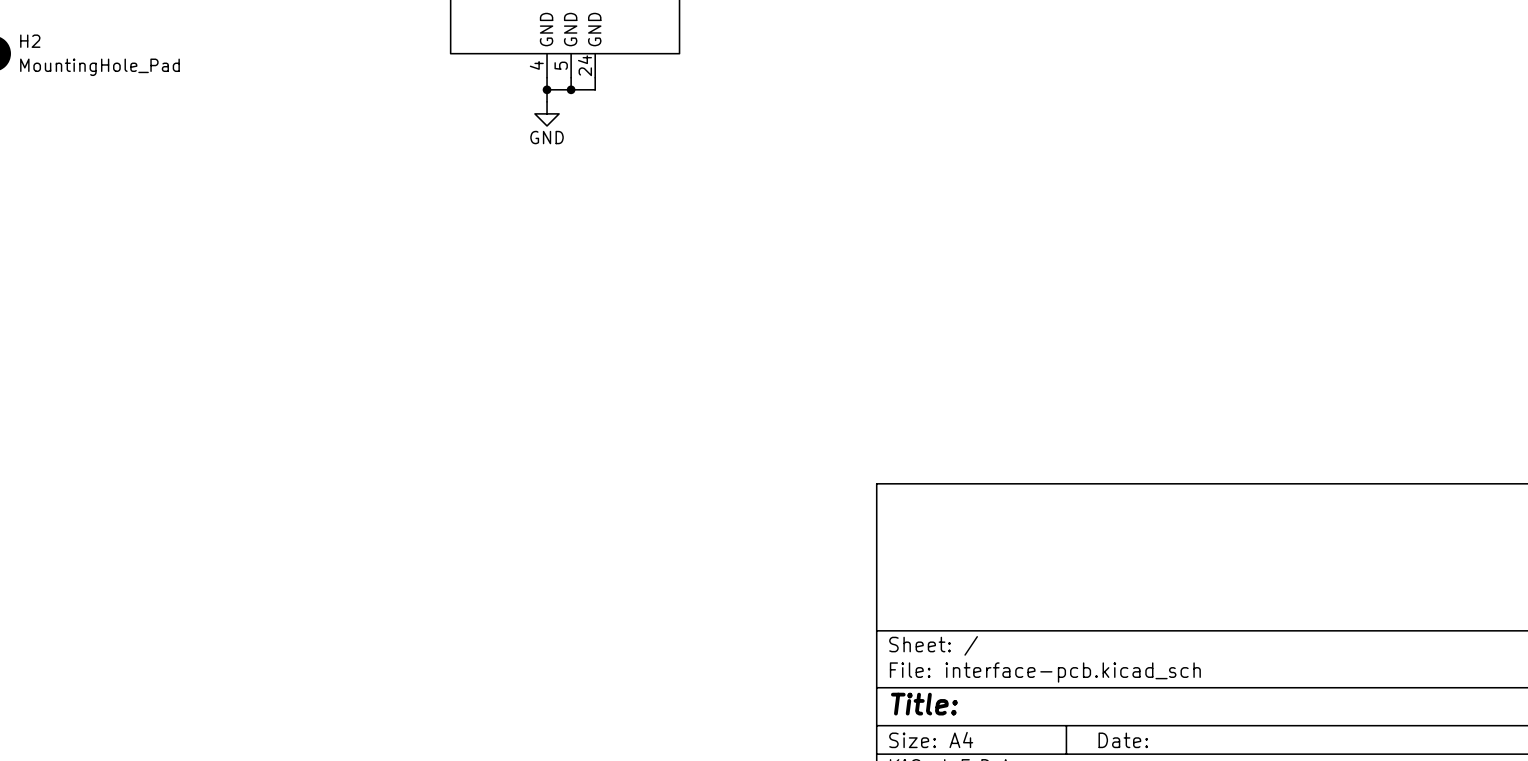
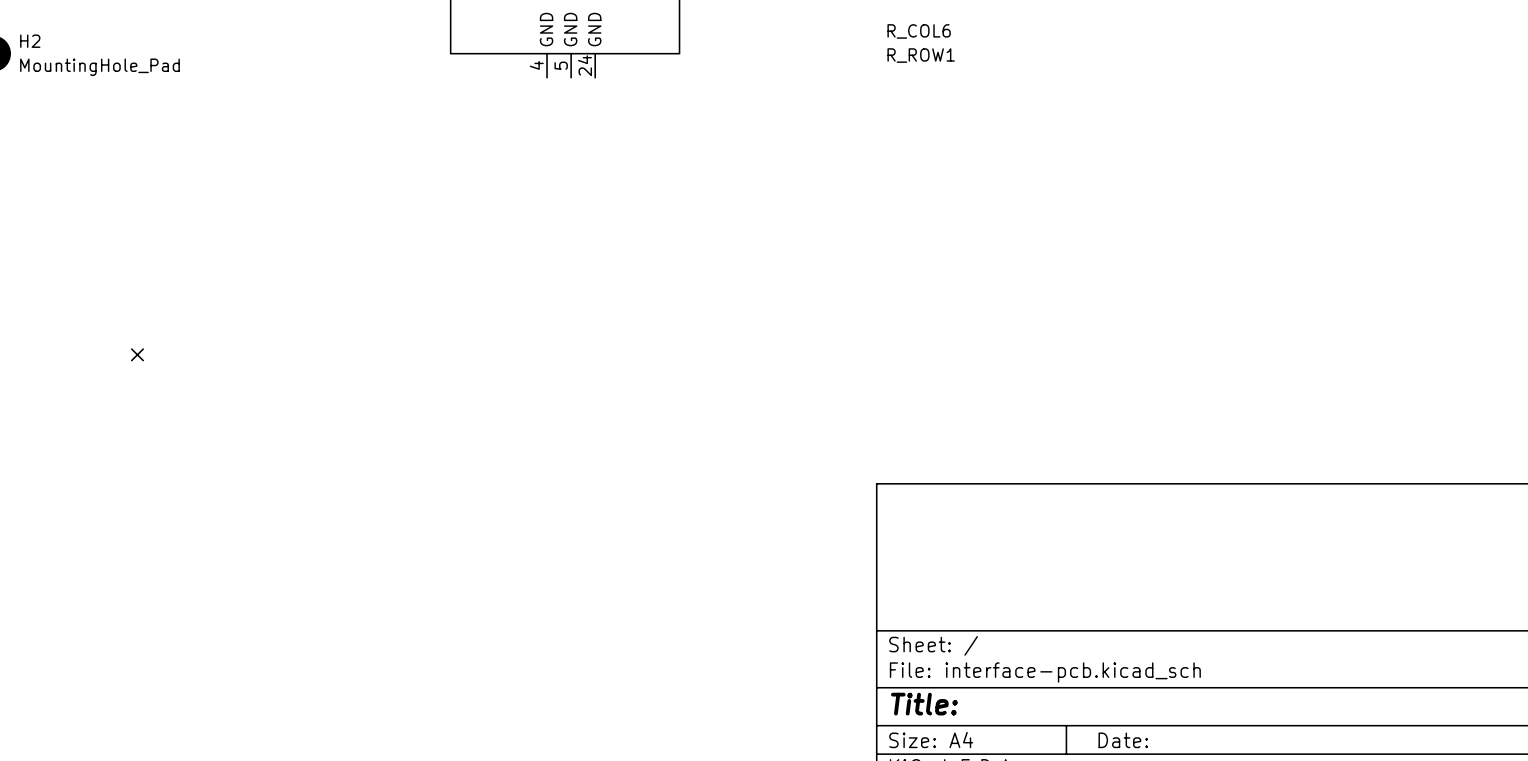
label: none -> R_COL6 (919, 31)
label: none -> R_ROW1 (921, 55)
wire: (547, 77) (547, 101) -> none
wire: (571, 77) (571, 89) -> none
wire: (595, 77) (595, 89) (547, 89) -> none
junction: (547, 89) -> none
junction: (571, 89) -> none
power symbol: GND (547, 113) -> none
no-connect mark: none -> (137, 354)

